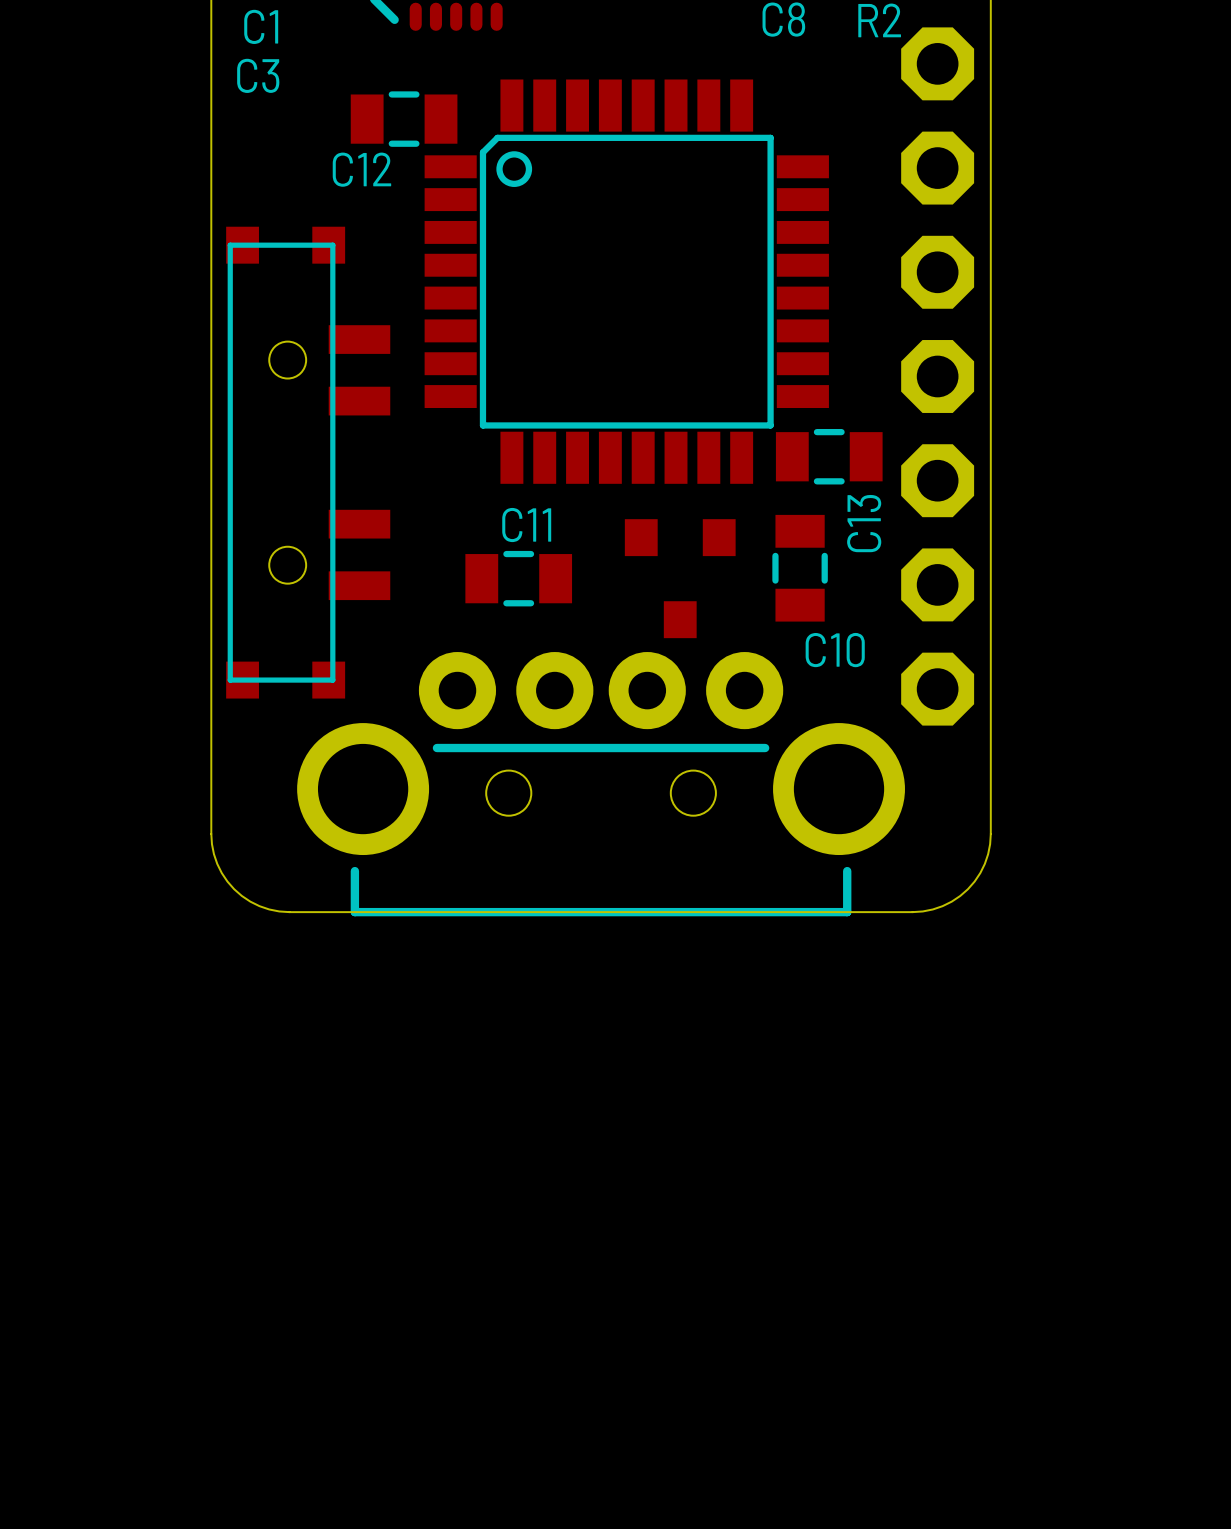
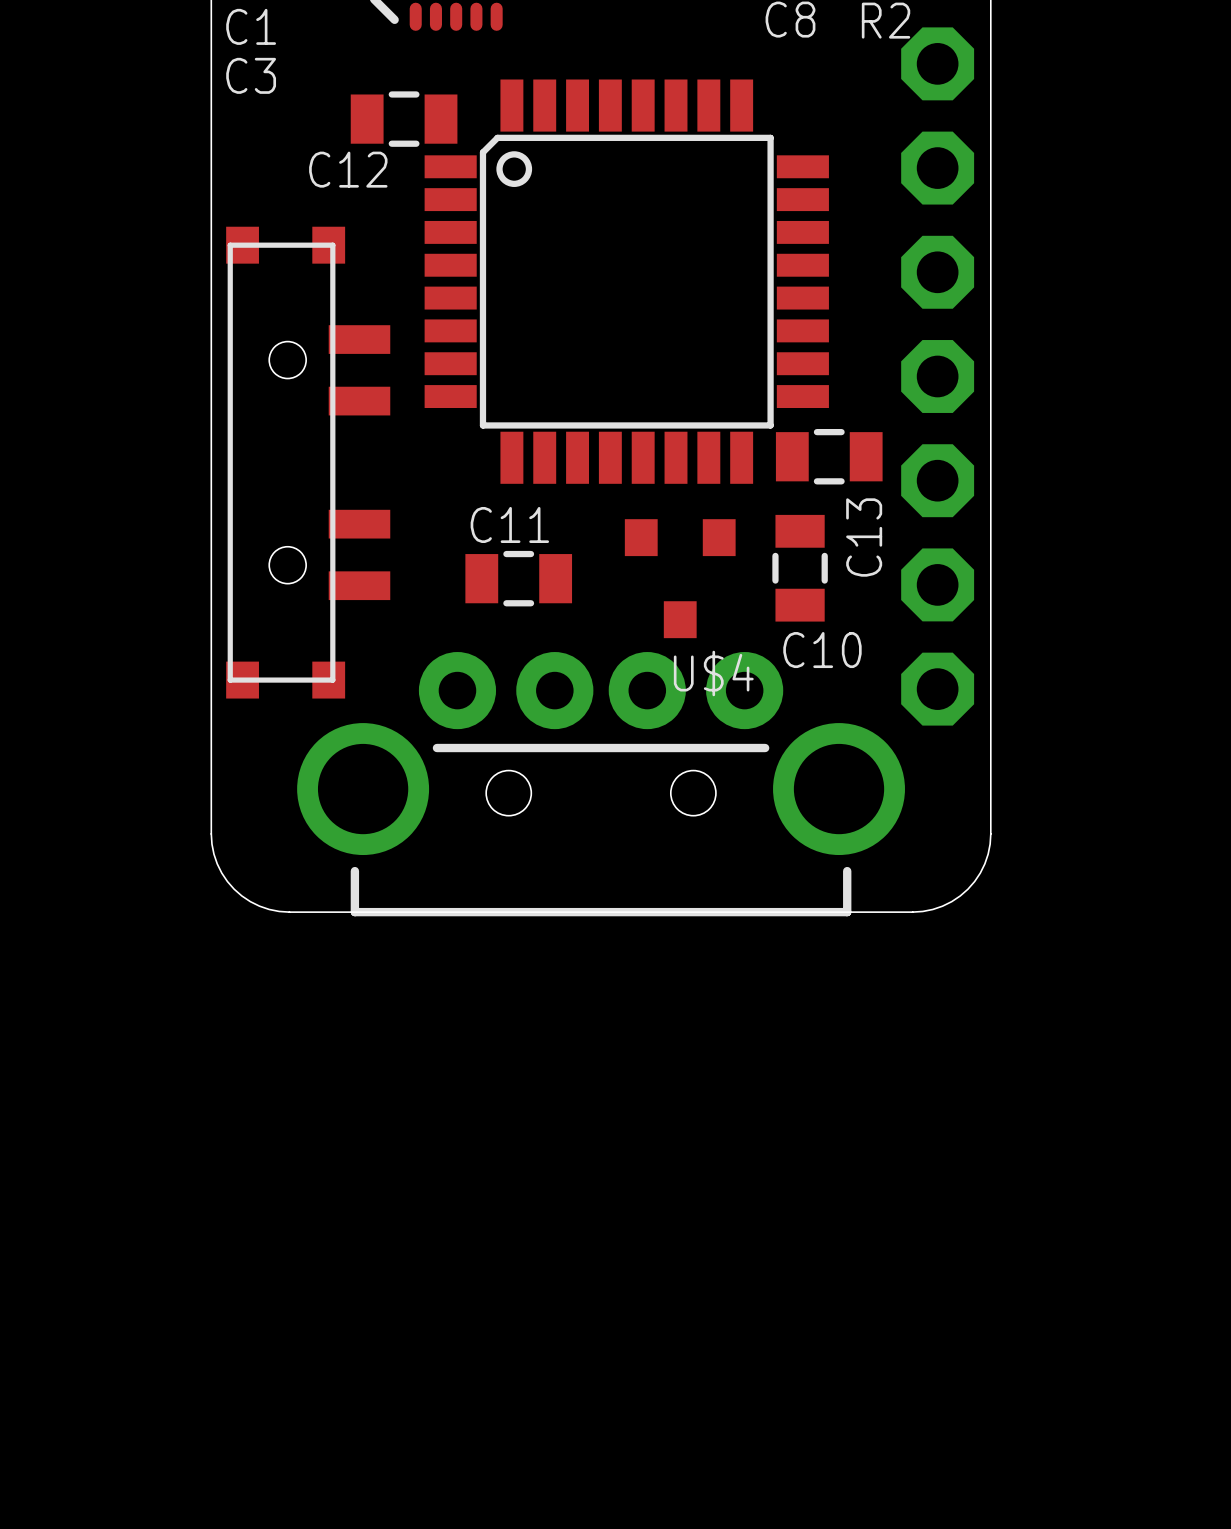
U$4 name: none -> U$4 (713, 673)

